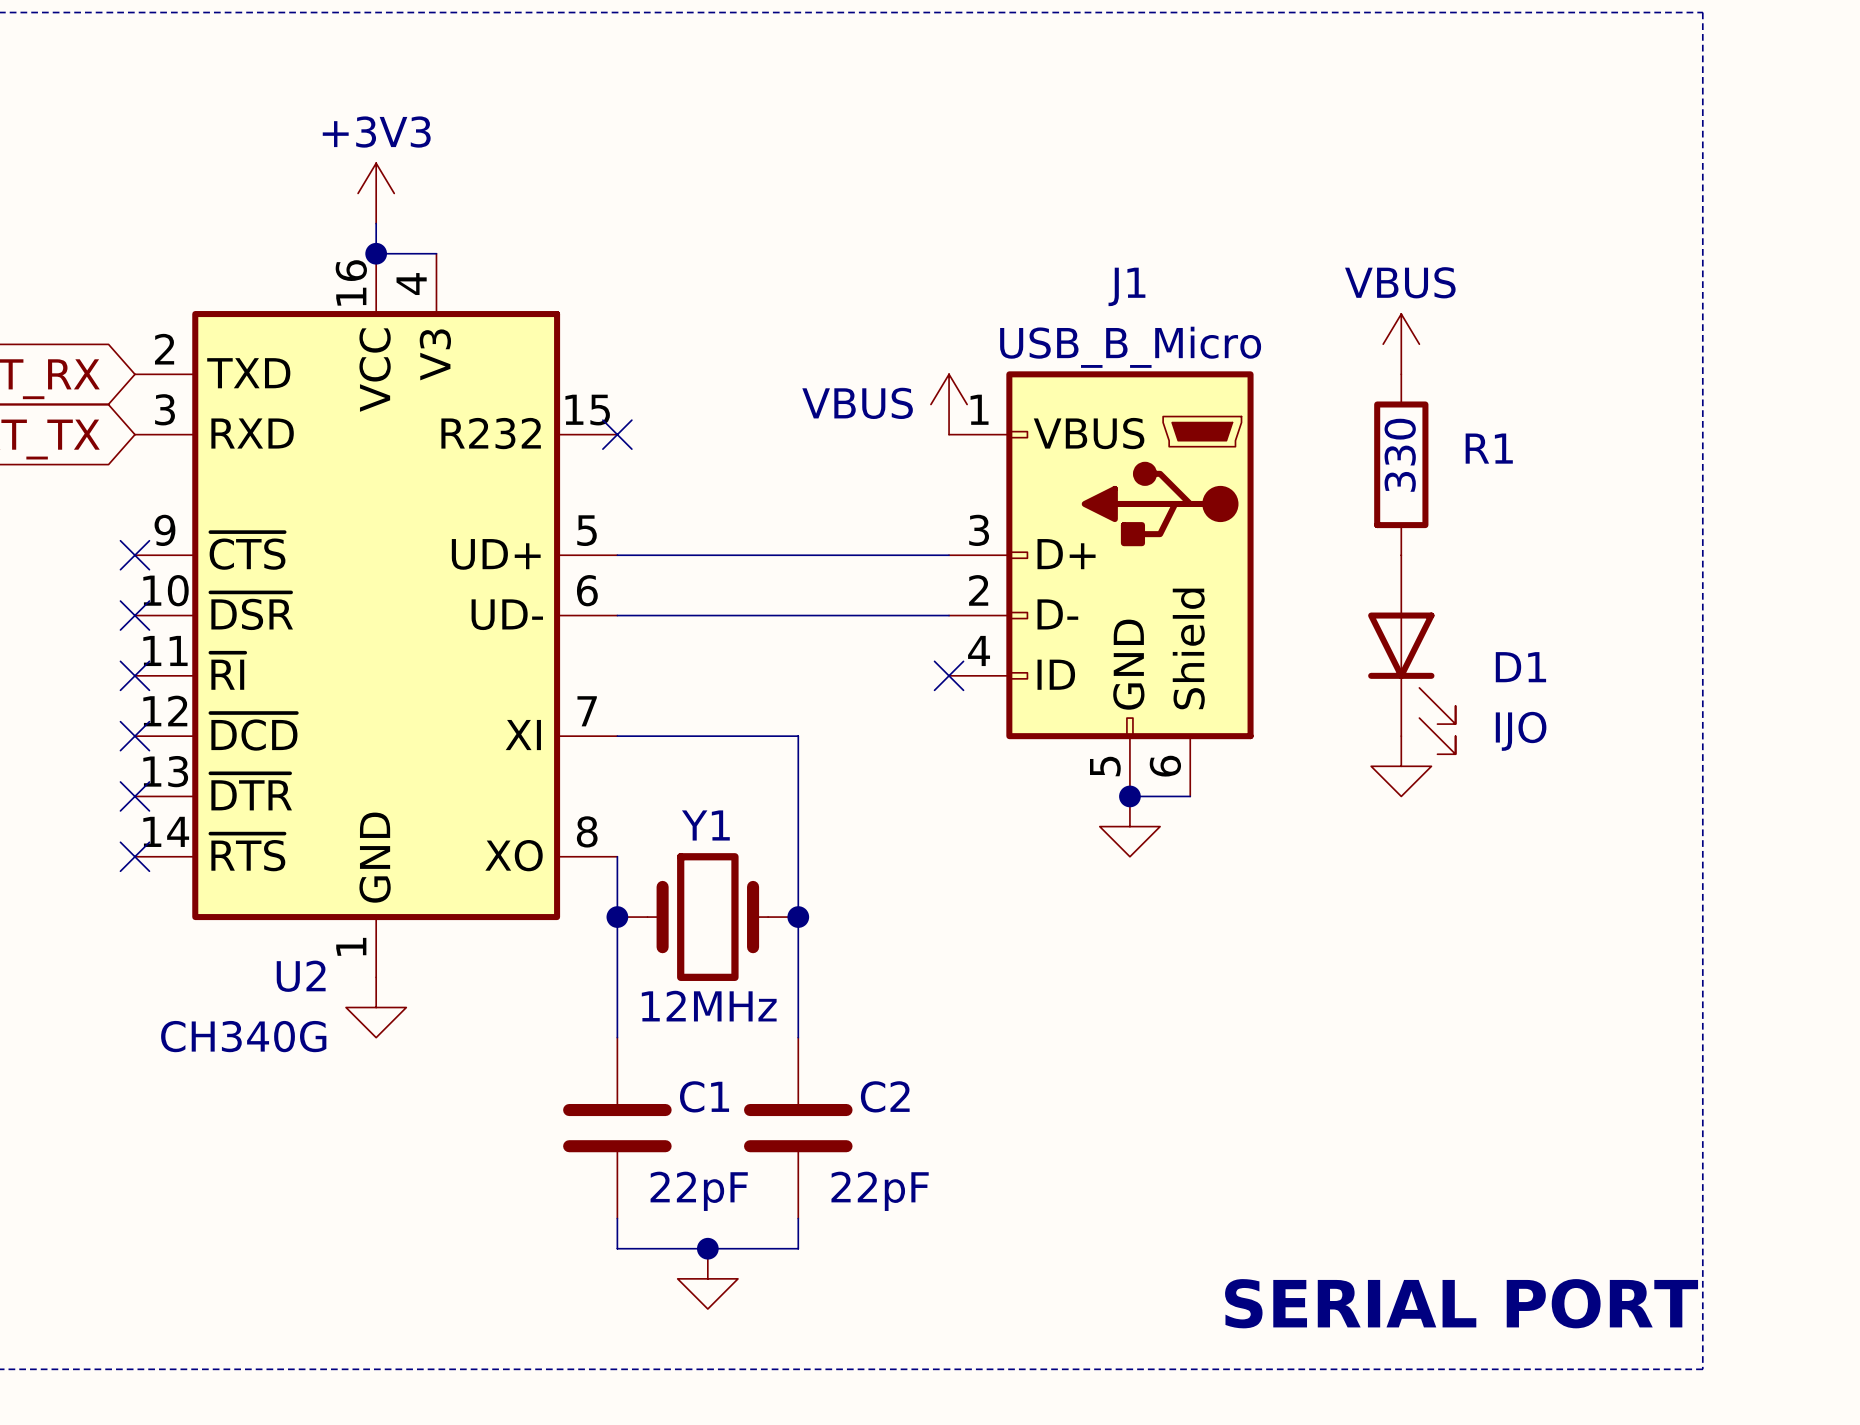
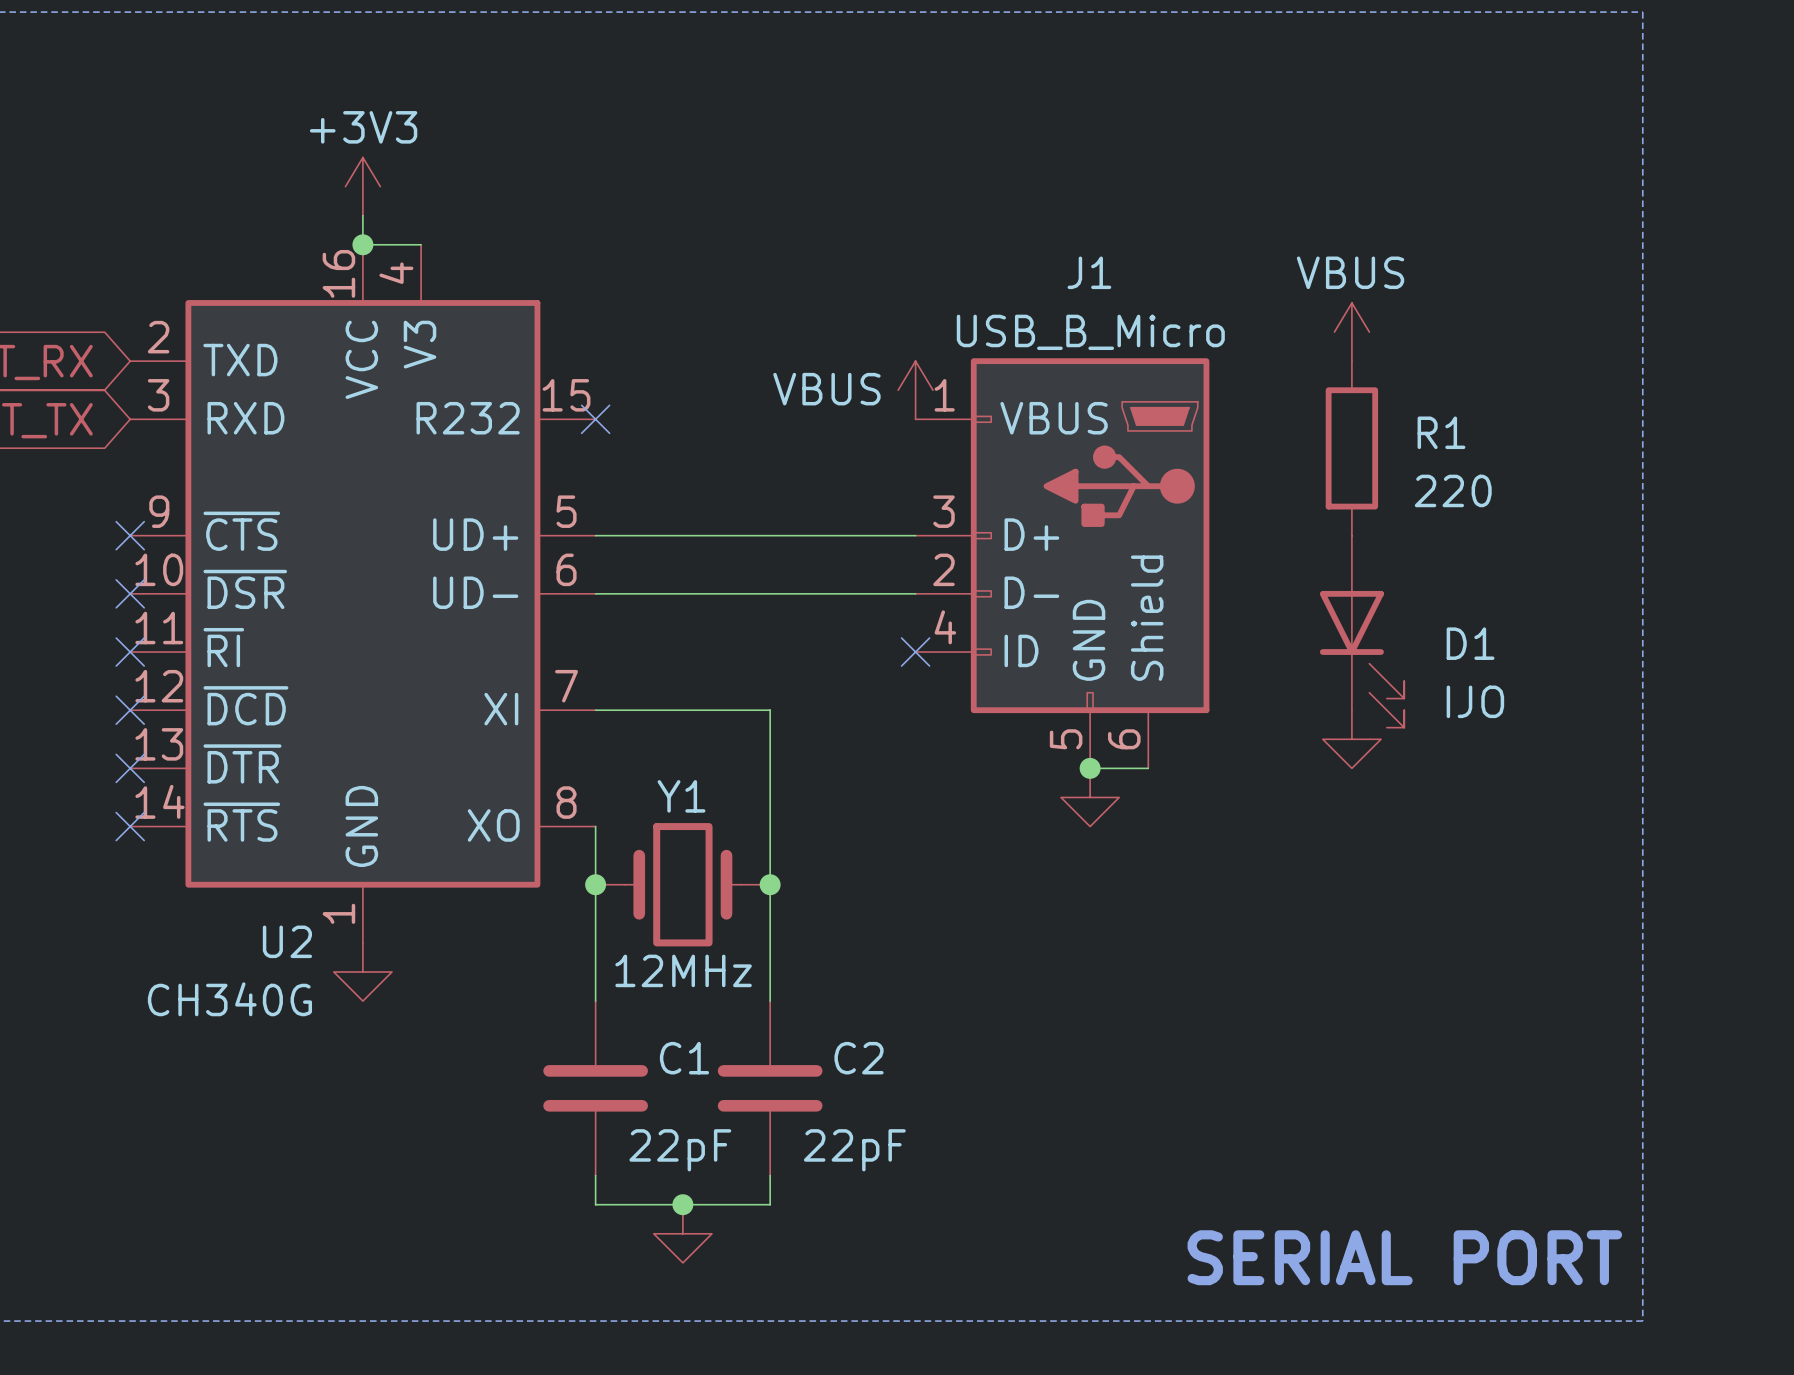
R1 value: 330 (1400, 455) -> 220 (1453, 490)

